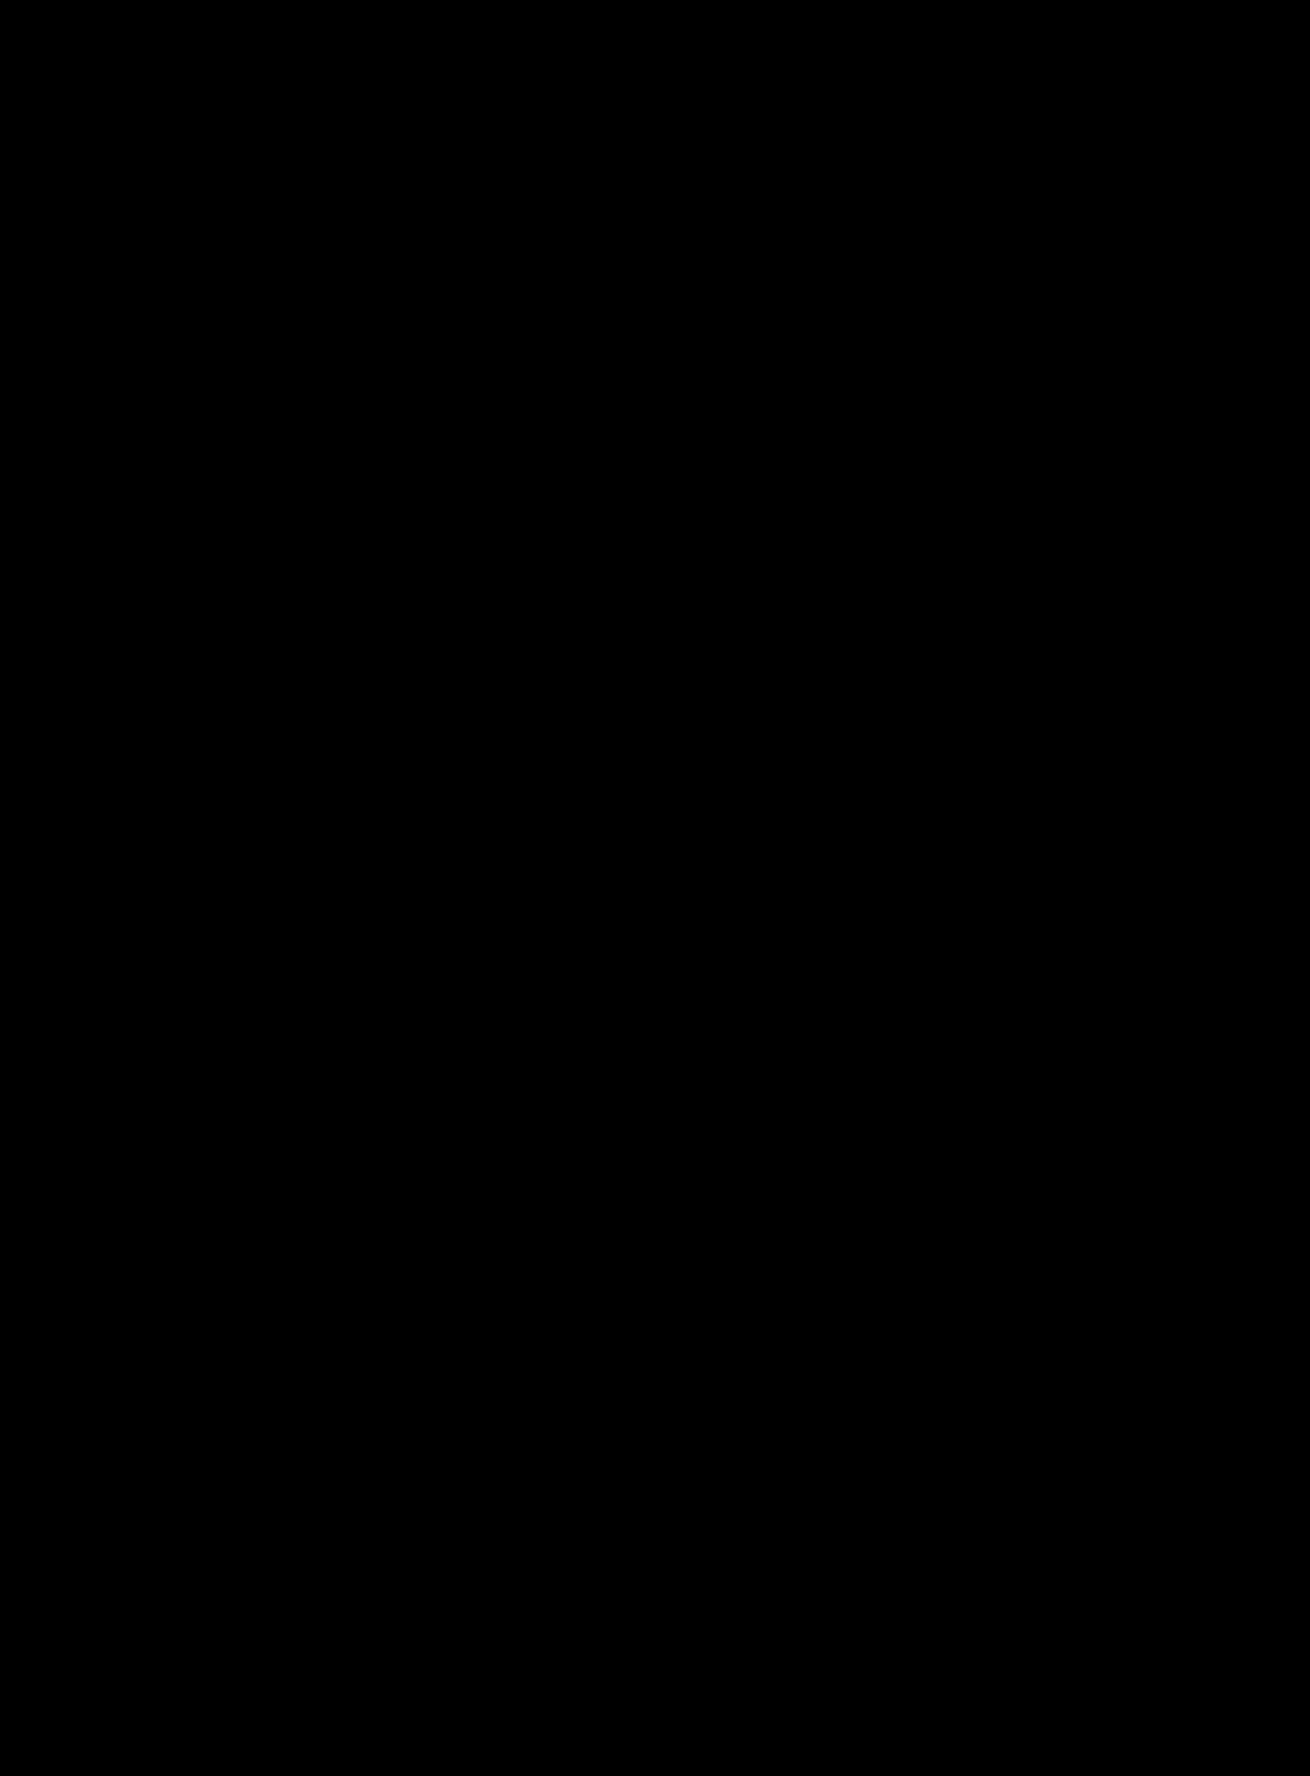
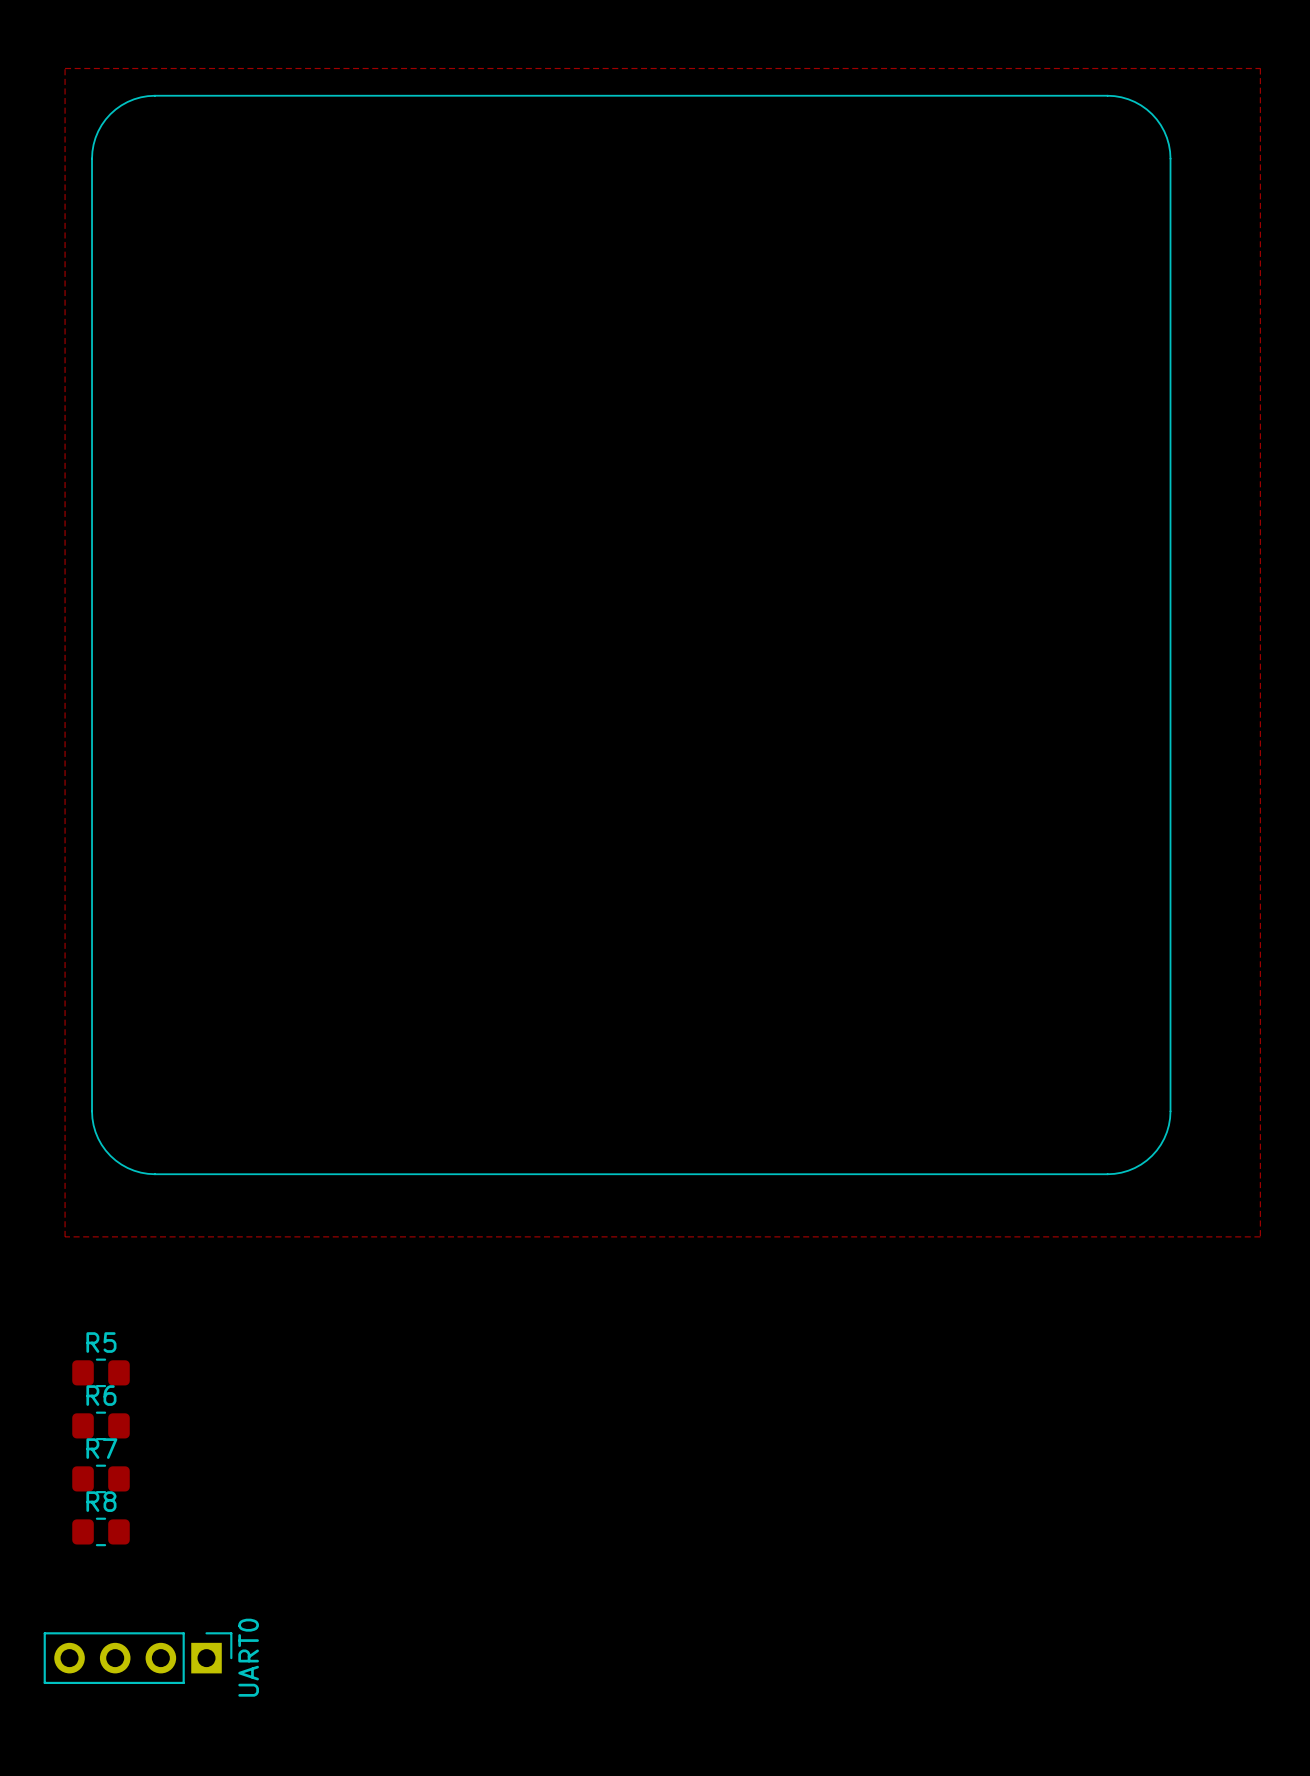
zone outline: none -> (65, 68) (65, 1236) (1260, 1236) (1260, 68) (65, 68)
line: none -> (154, 95) (1107, 95) (1128, 99) (1141, 105) (1152, 114) (1164, 131) (1168, 144) (1170, 158) (1170, 1111) (1166, 1132) (1160, 1144) (1152, 1155) (1134, 1168) (1121, 1172) (1107, 1174) (154, 1174) (134, 1170) (121, 1164) (110, 1155) (98, 1138) (93, 1125) (92, 1111) (92, 158) (95, 137) (101, 125) (110, 114) (121, 105) (134, 99) (154, 95)
R5: none -> (101, 1372)
R6: none -> (101, 1425)
R7: none -> (101, 1478)
R8: none -> (101, 1531)
UART0: none -> (138, 1658)

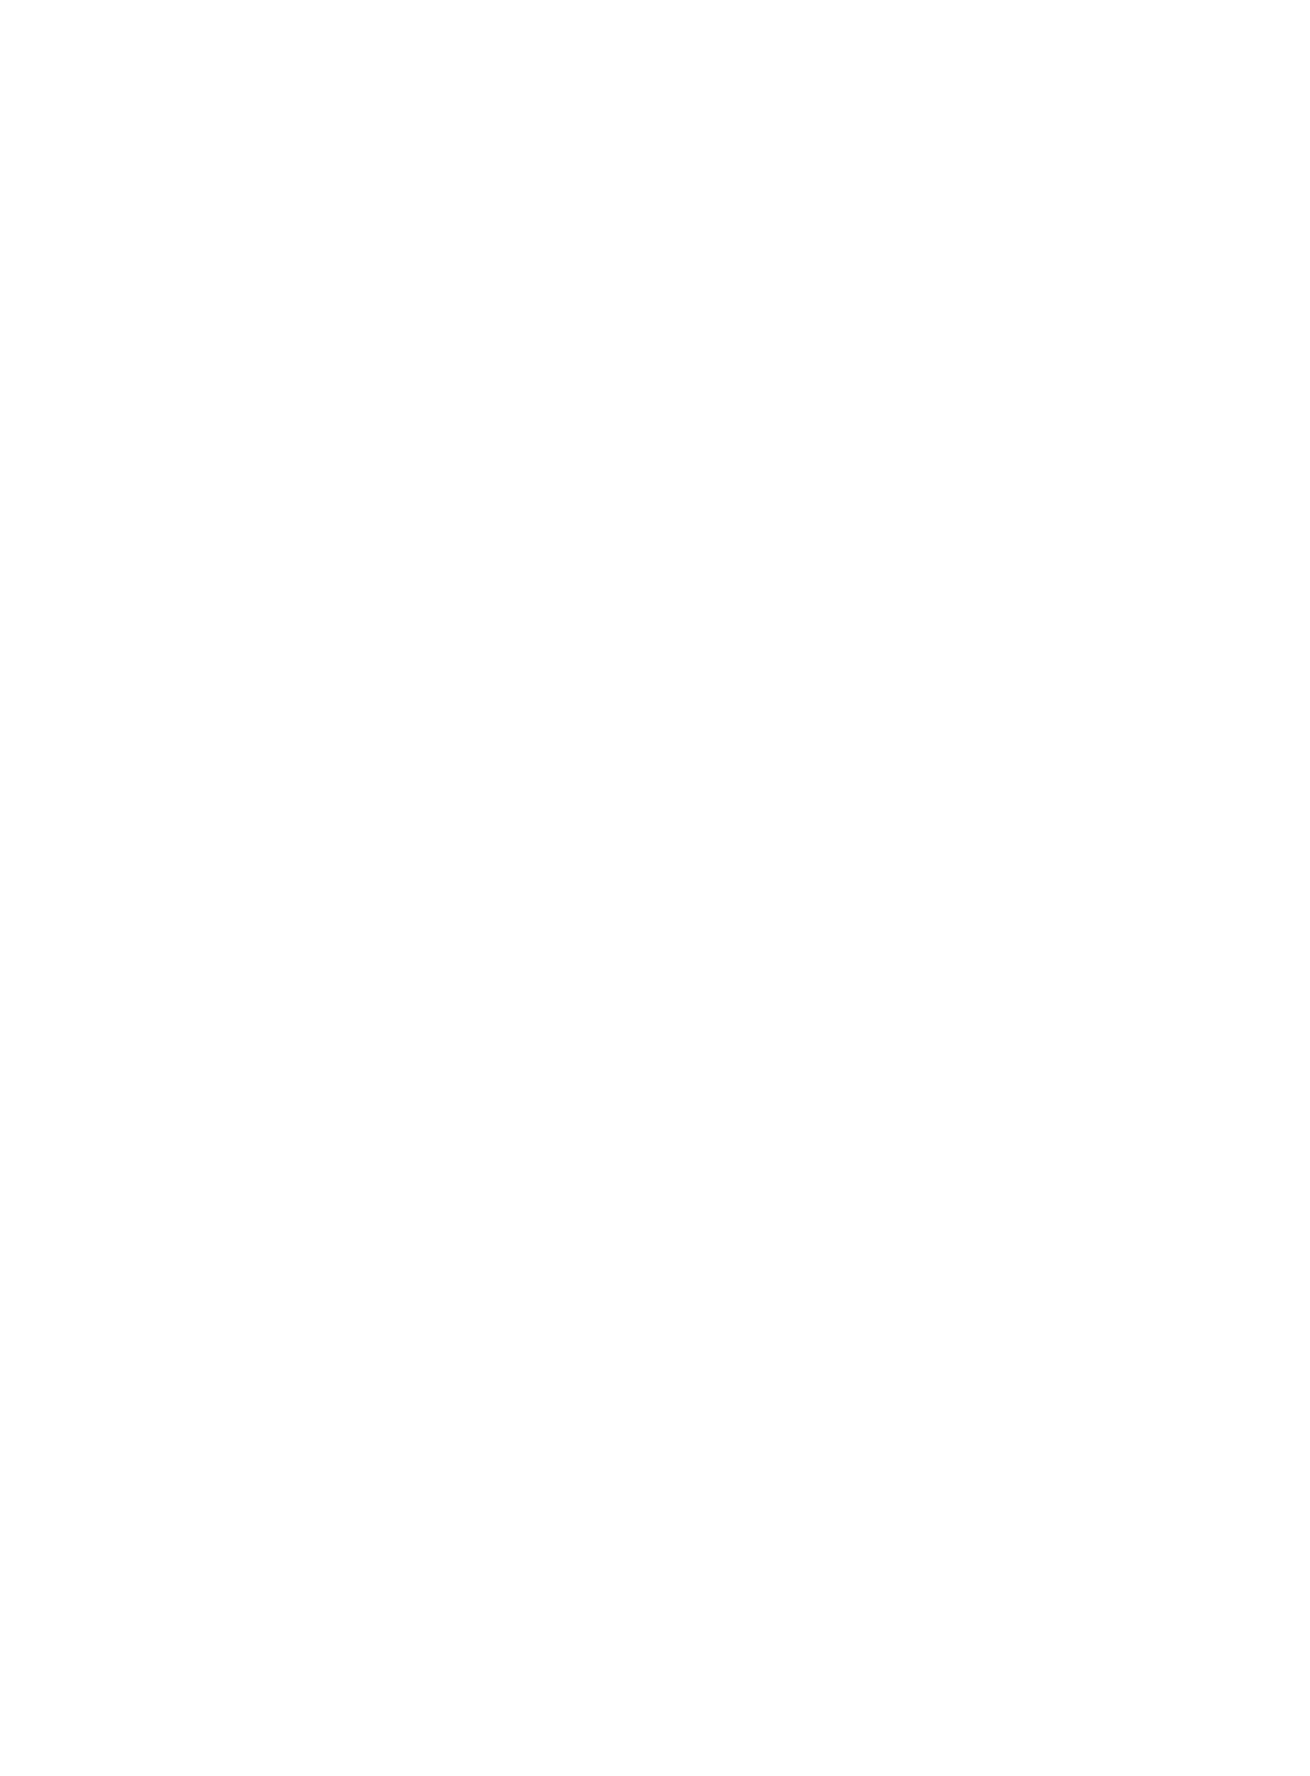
zone outline: (65, 68) (65, 1236) (1260, 1236) (1260, 68) (65, 68) -> none
line: (154, 95) (1107, 95) (1128, 99) (1141, 105) (1152, 114) (1164, 131) (1168, 144) (1170, 158) (1170, 1111) (1166, 1132) (1160, 1144) (1152, 1155) (1134, 1168) (1121, 1172) (1107, 1174) (154, 1174) (134, 1170) (121, 1164) (110, 1155) (98, 1138) (93, 1125) (92, 1111) (92, 158) (95, 137) (101, 125) (110, 114) (121, 105) (134, 99) (154, 95) -> none
R5: (101, 1372) -> none
R6: (101, 1425) -> none
R7: (101, 1478) -> none
R8: (101, 1531) -> none
UART0: (138, 1658) -> none

